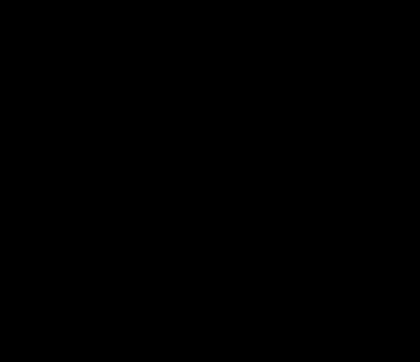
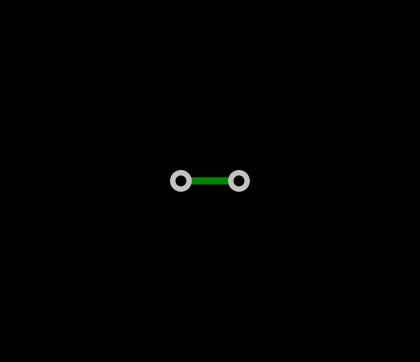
via: none -> (180, 180)
track: none -> (238, 180) (180, 180)
via: none -> (238, 180)

